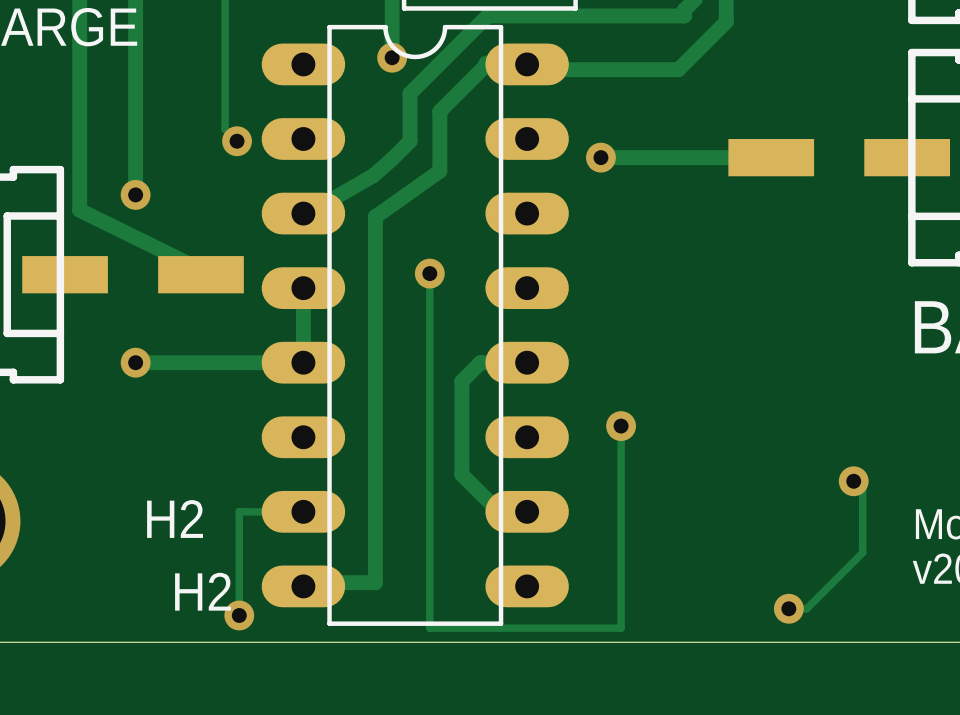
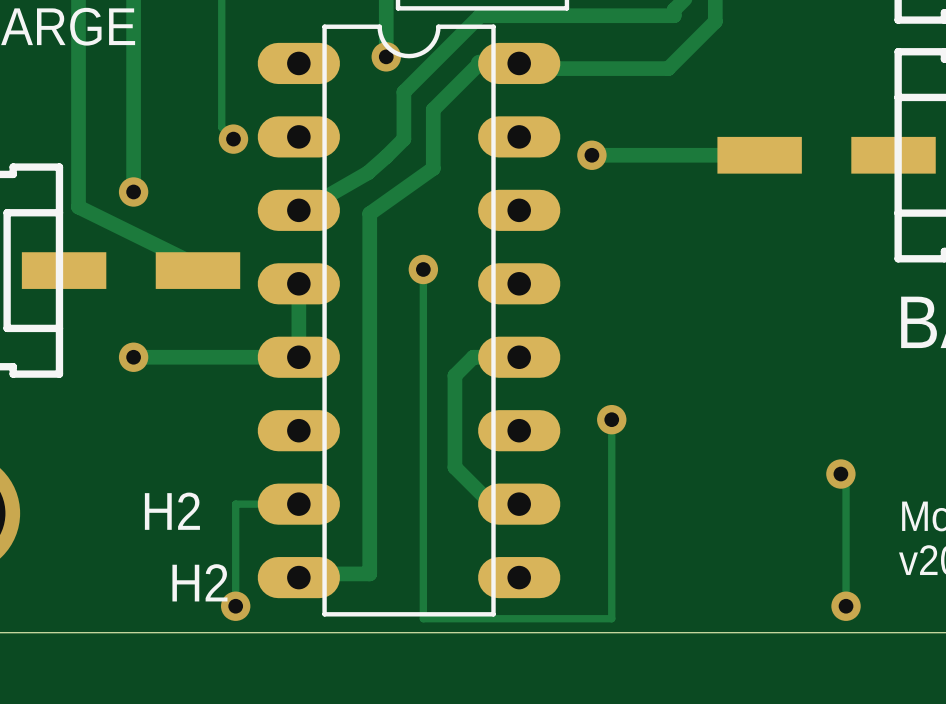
track: (853, 481) (862, 490) (862, 552) (806, 608) (788, 608) -> none
track: none -> (846, 474) (846, 606)
via position: (788, 608) -> (846, 606)

